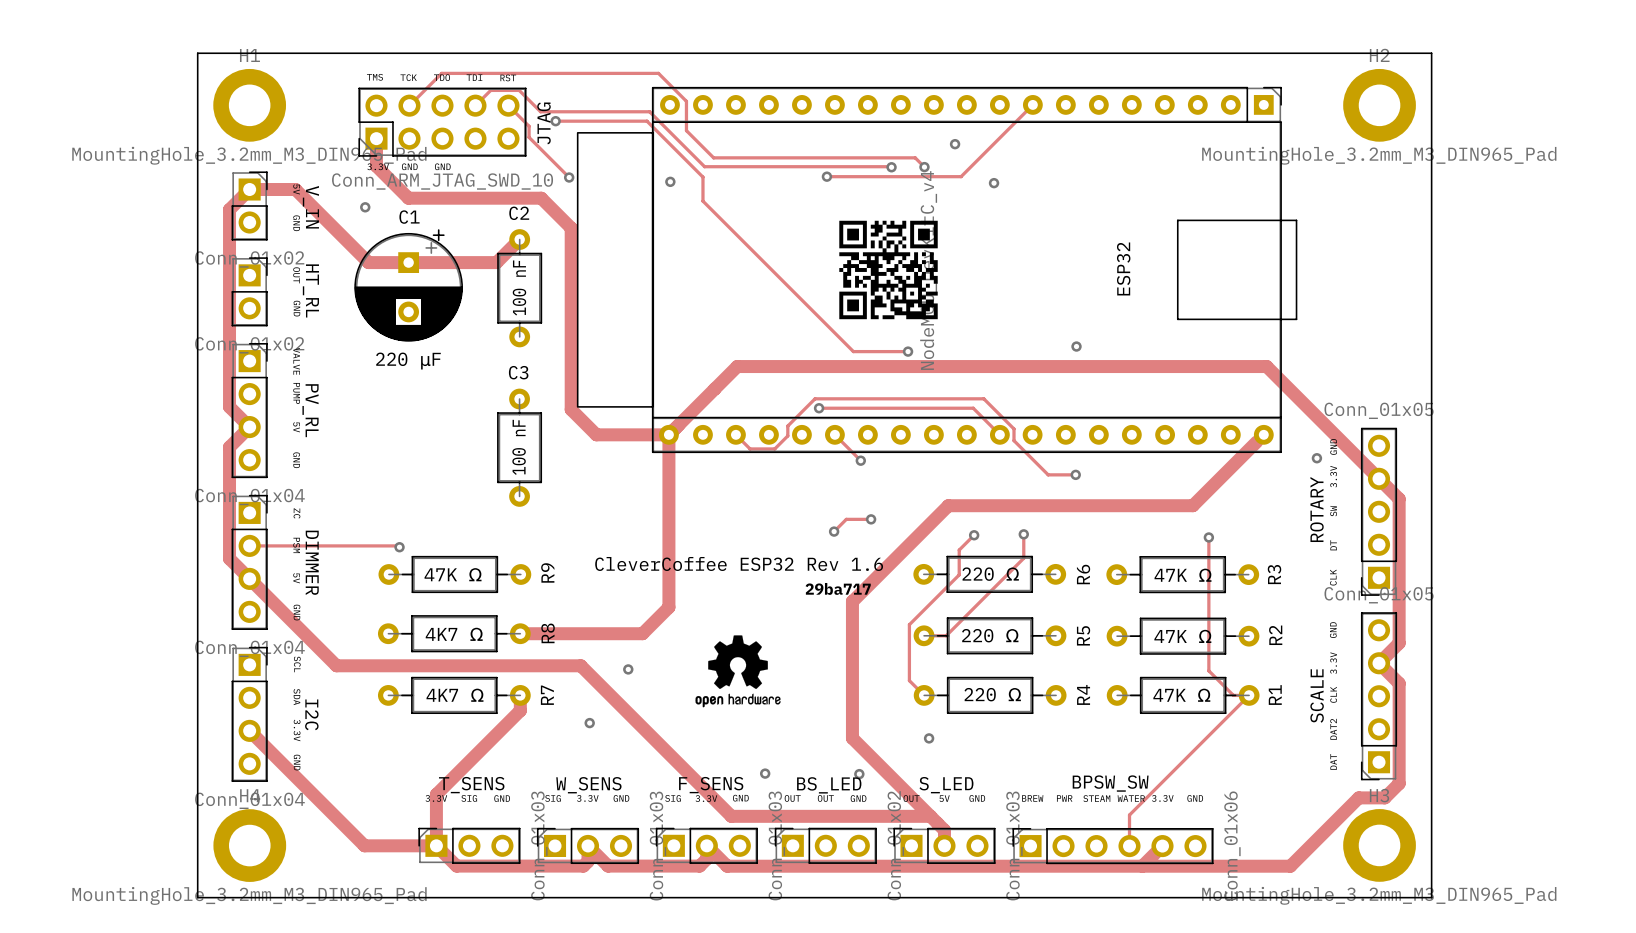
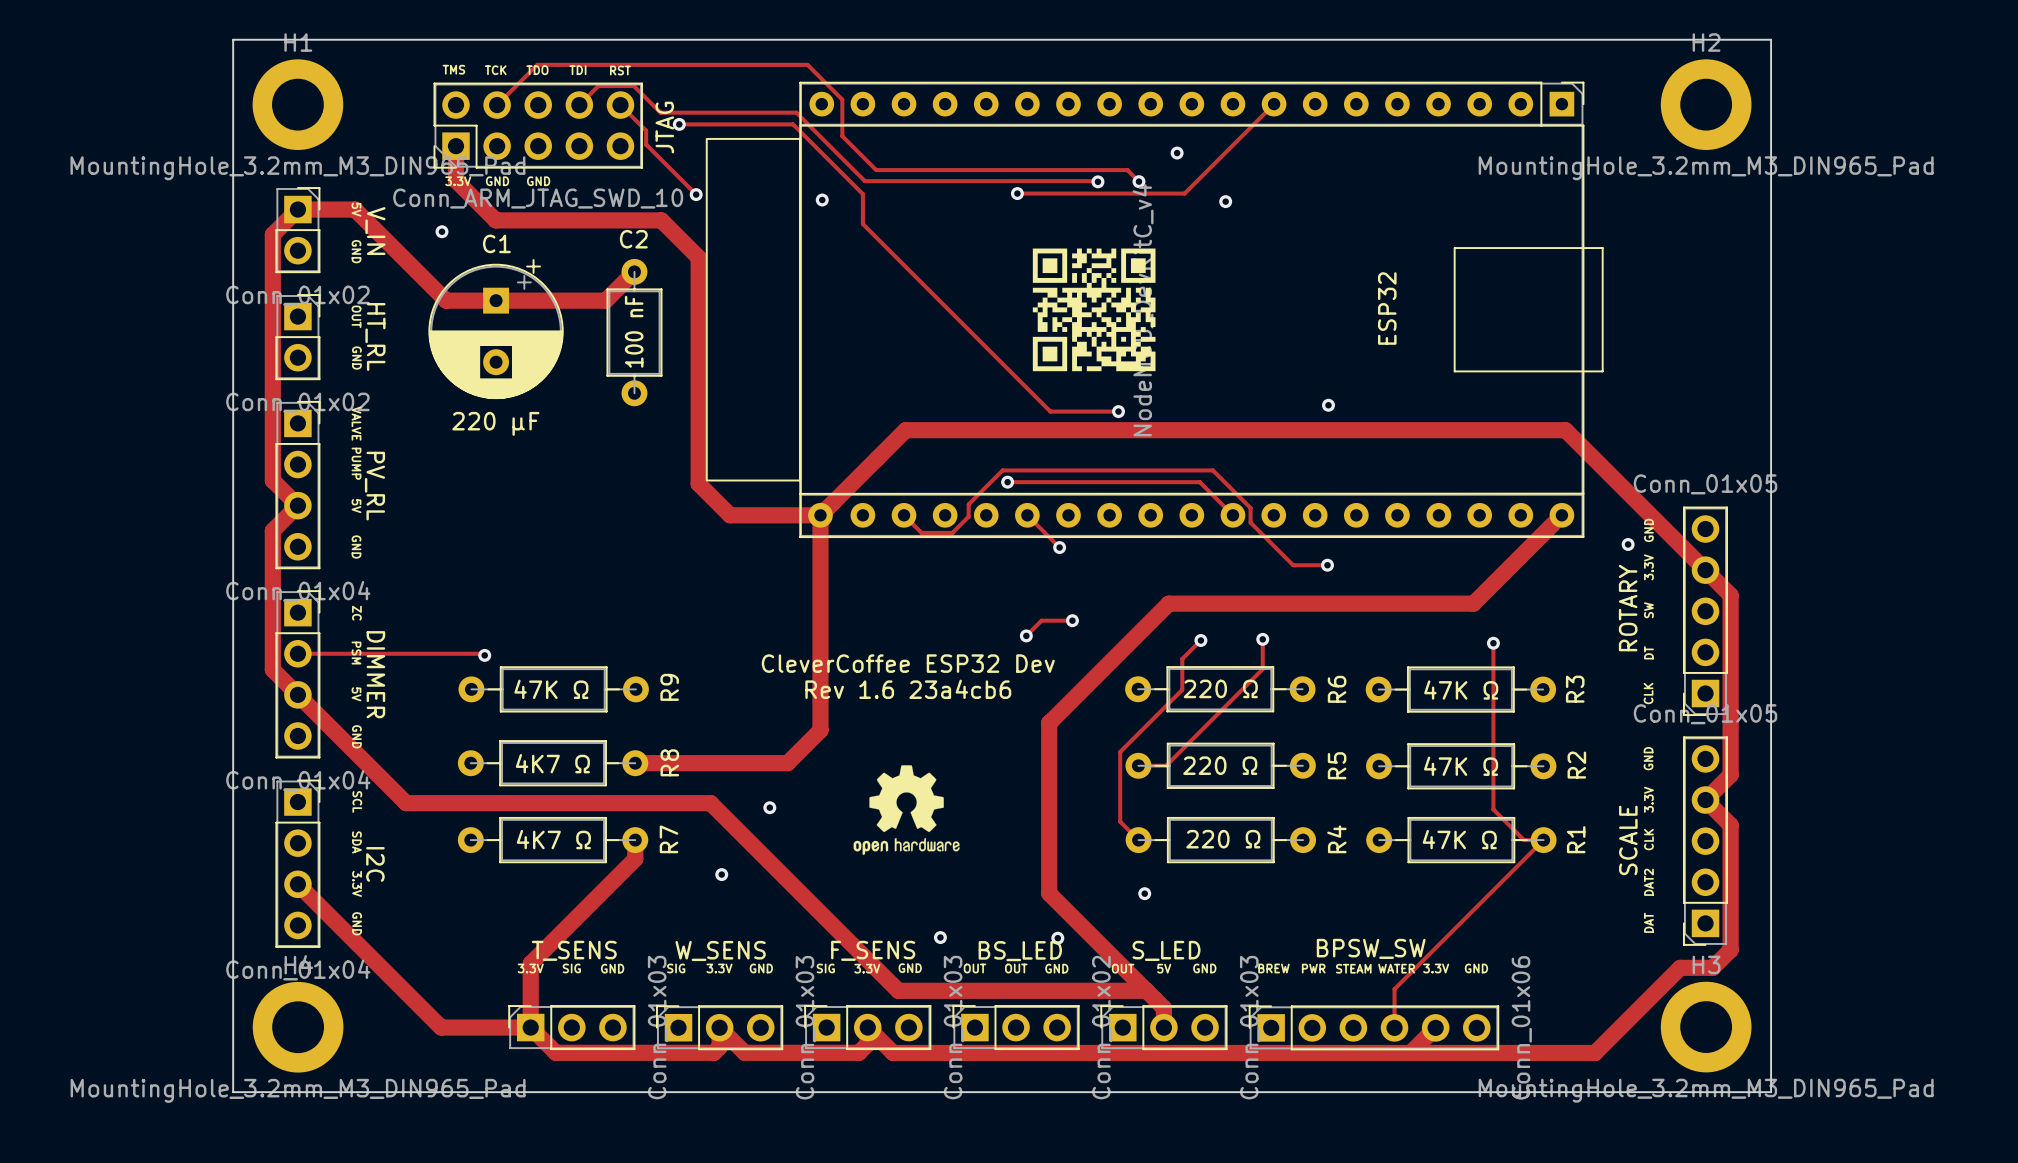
C3: 100 nF (519, 447) -> none
text: CleverCoffee ESP32 Rev 1.6 (739, 563) -> CleverCoffee ESP32 Dev (908, 663)
text: none -> Rev 1.6 23a4cb6 (908, 689)
text: 29ba717 (838, 588) -> none

